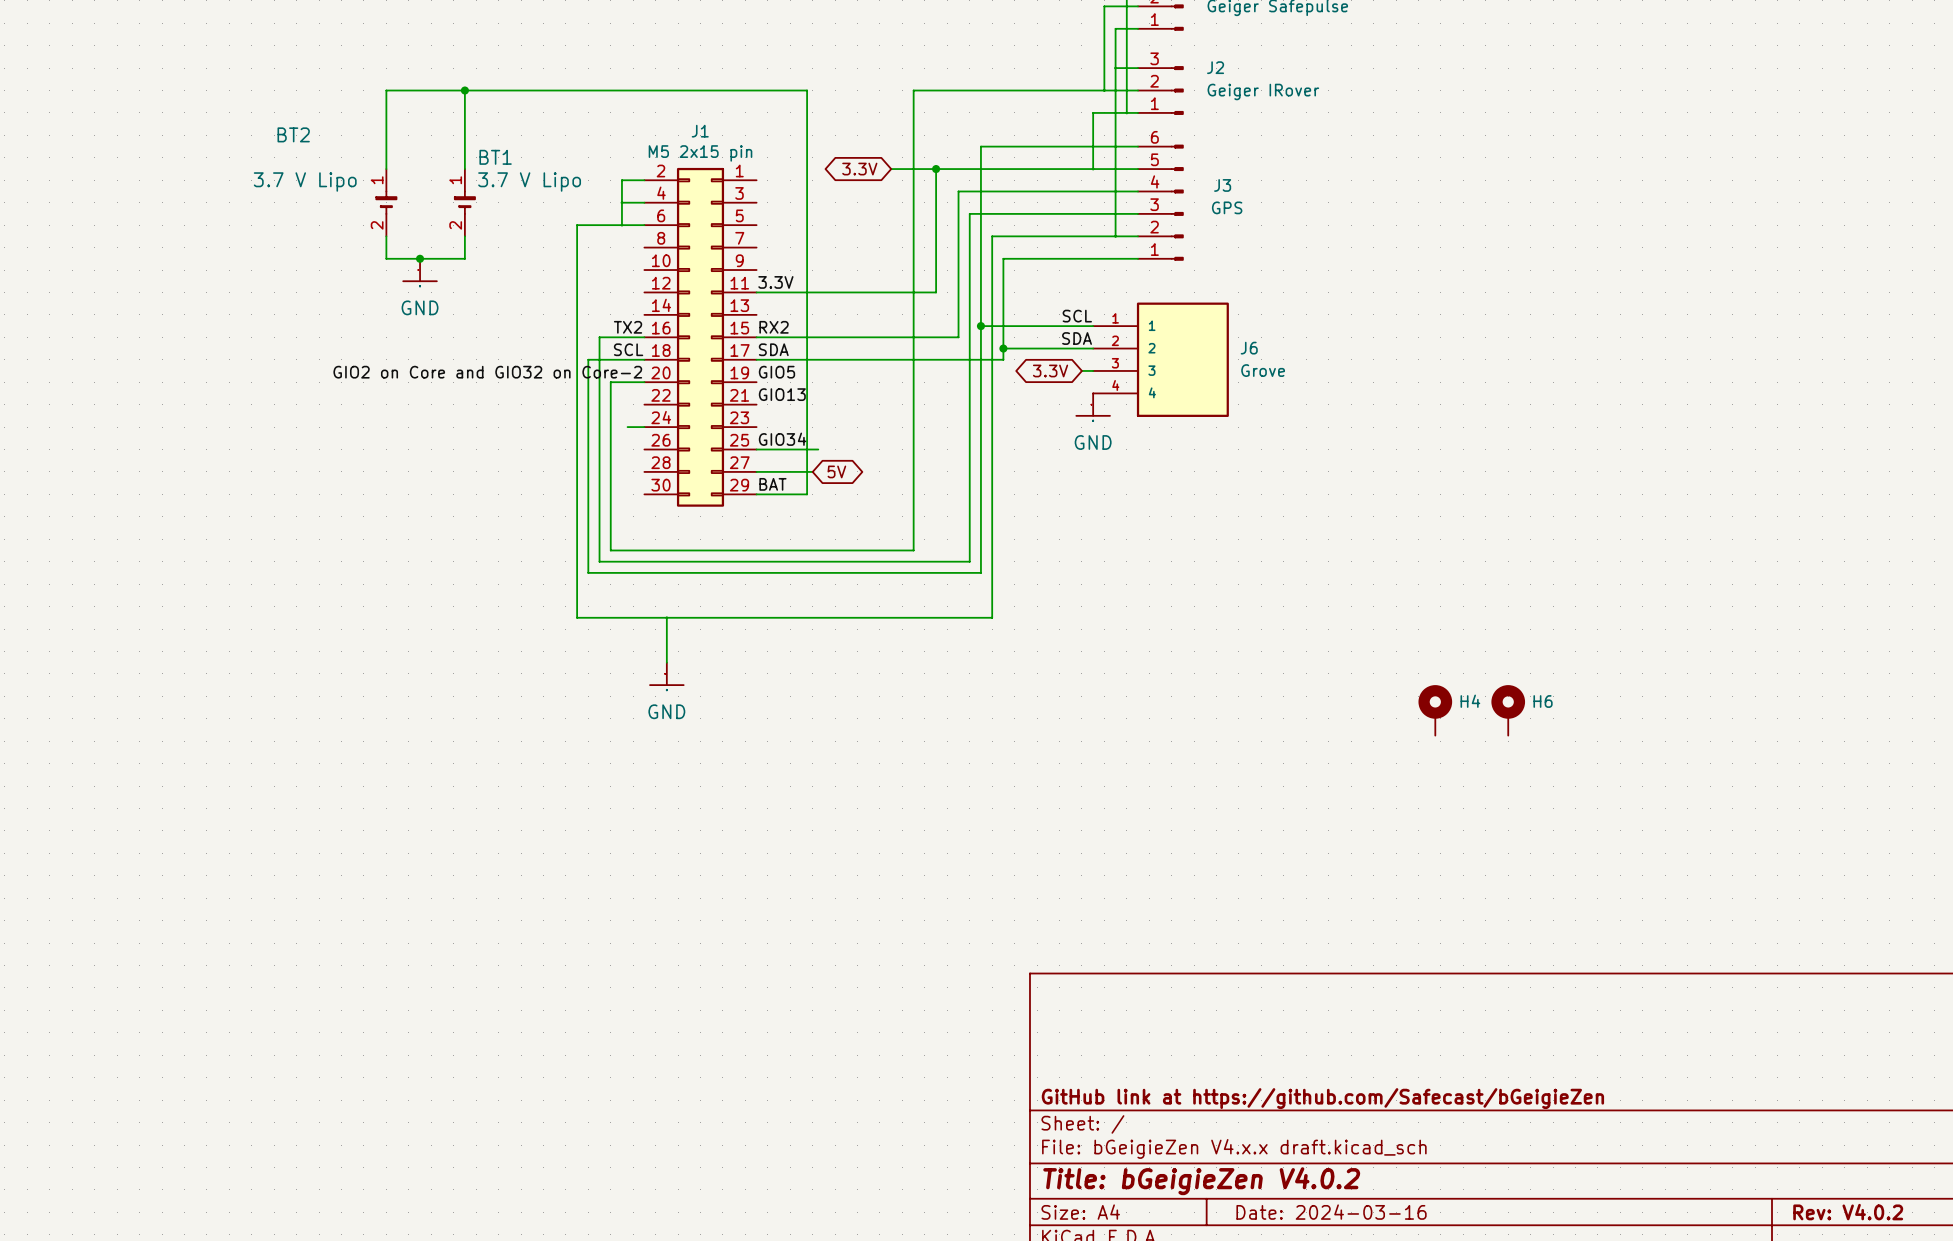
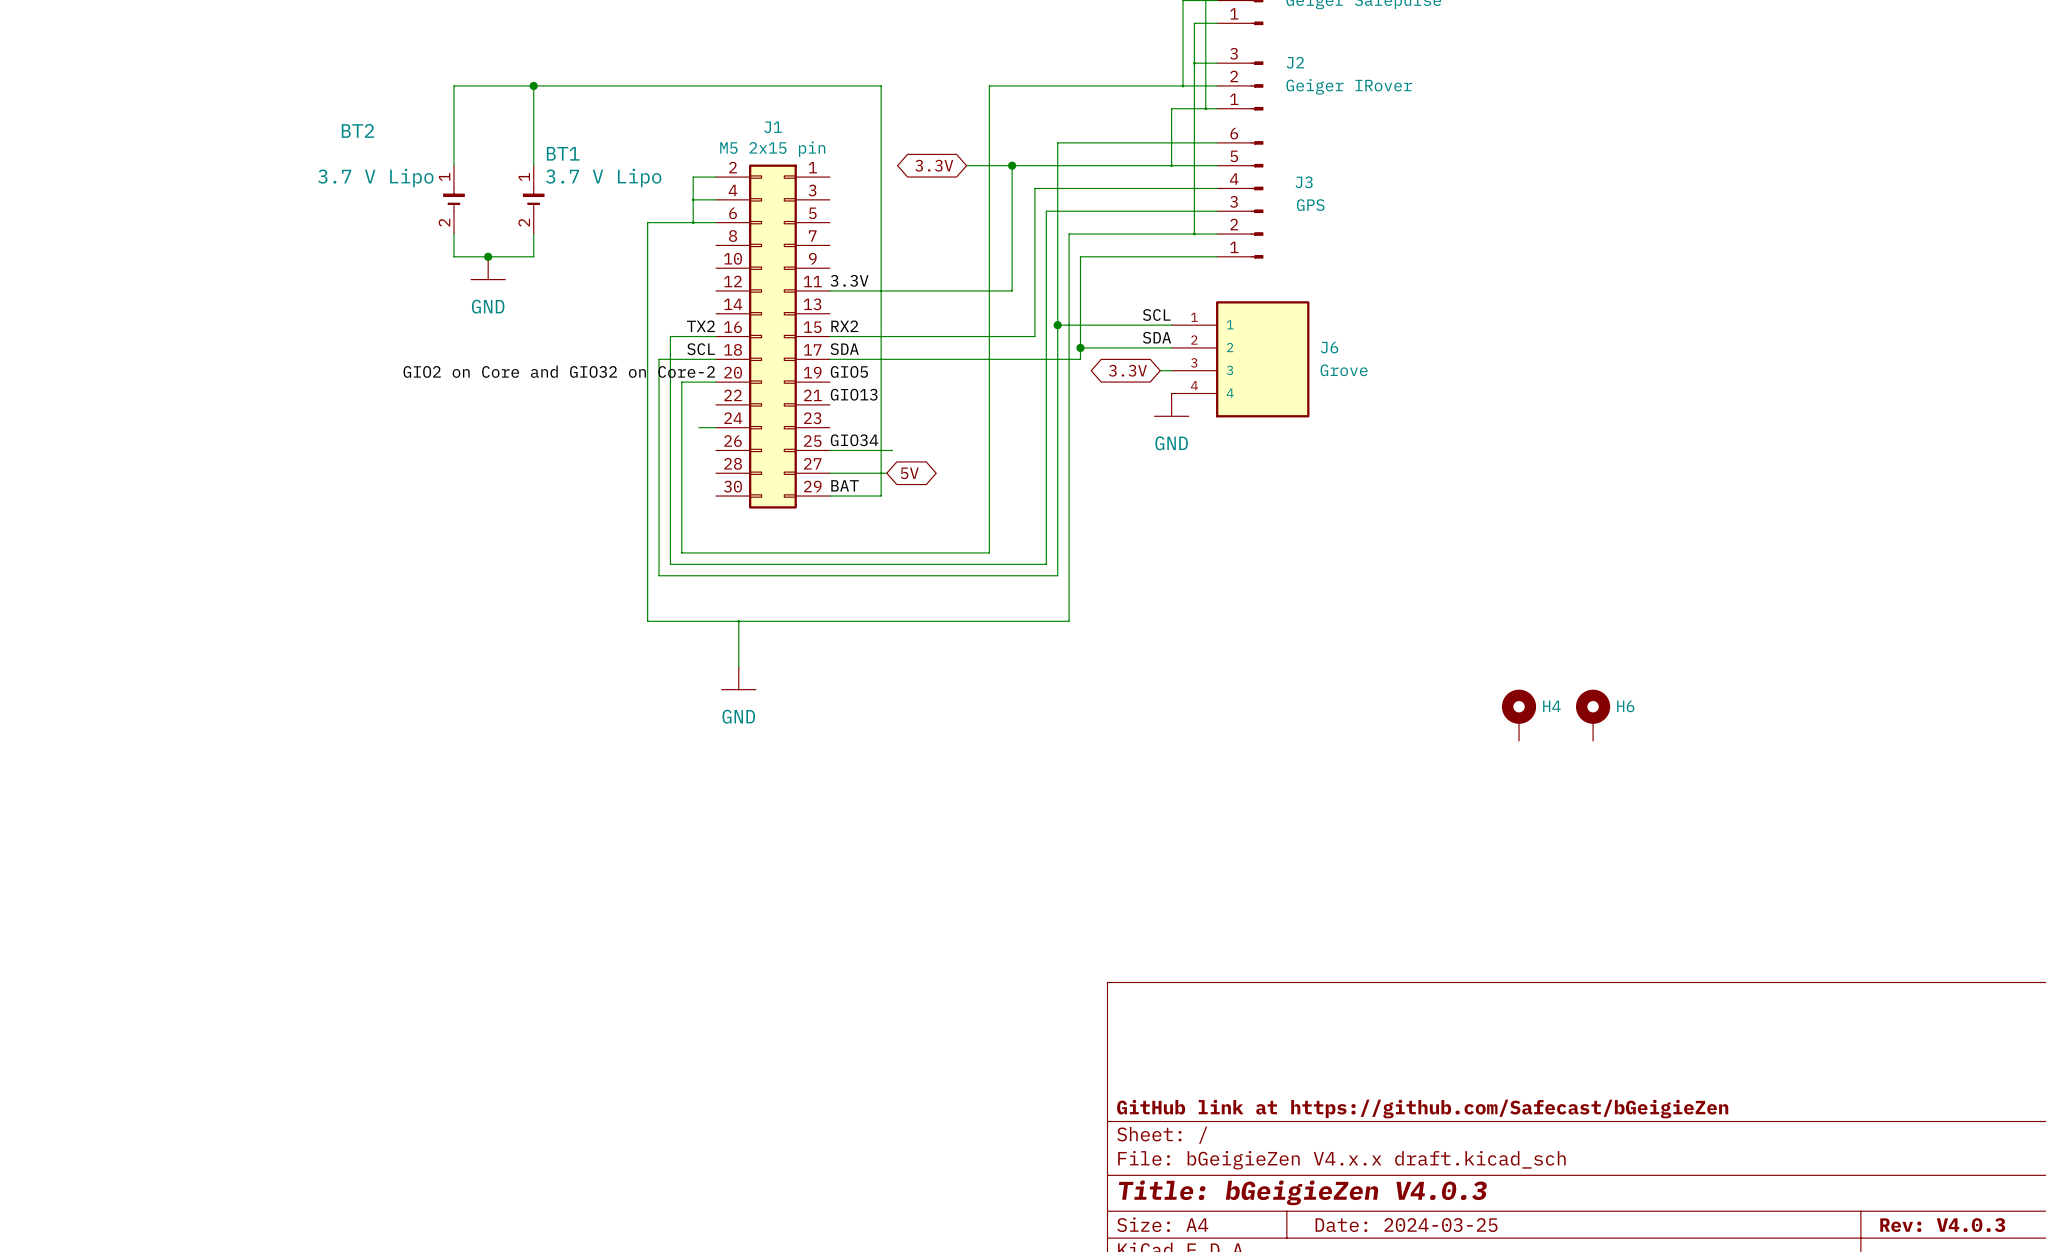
title block: Title: bGeigieZen V4.0.2 (1201, 1181) -> Title: bGeigieZen V4.0.3 (1302, 1192)
title block: Date: 2024-03-16 (1331, 1212) -> Date: 2024-03-25 (1406, 1225)
title block: Rev: V4.0.2 (1848, 1212) -> Rev: V4.0.3 (1942, 1225)

